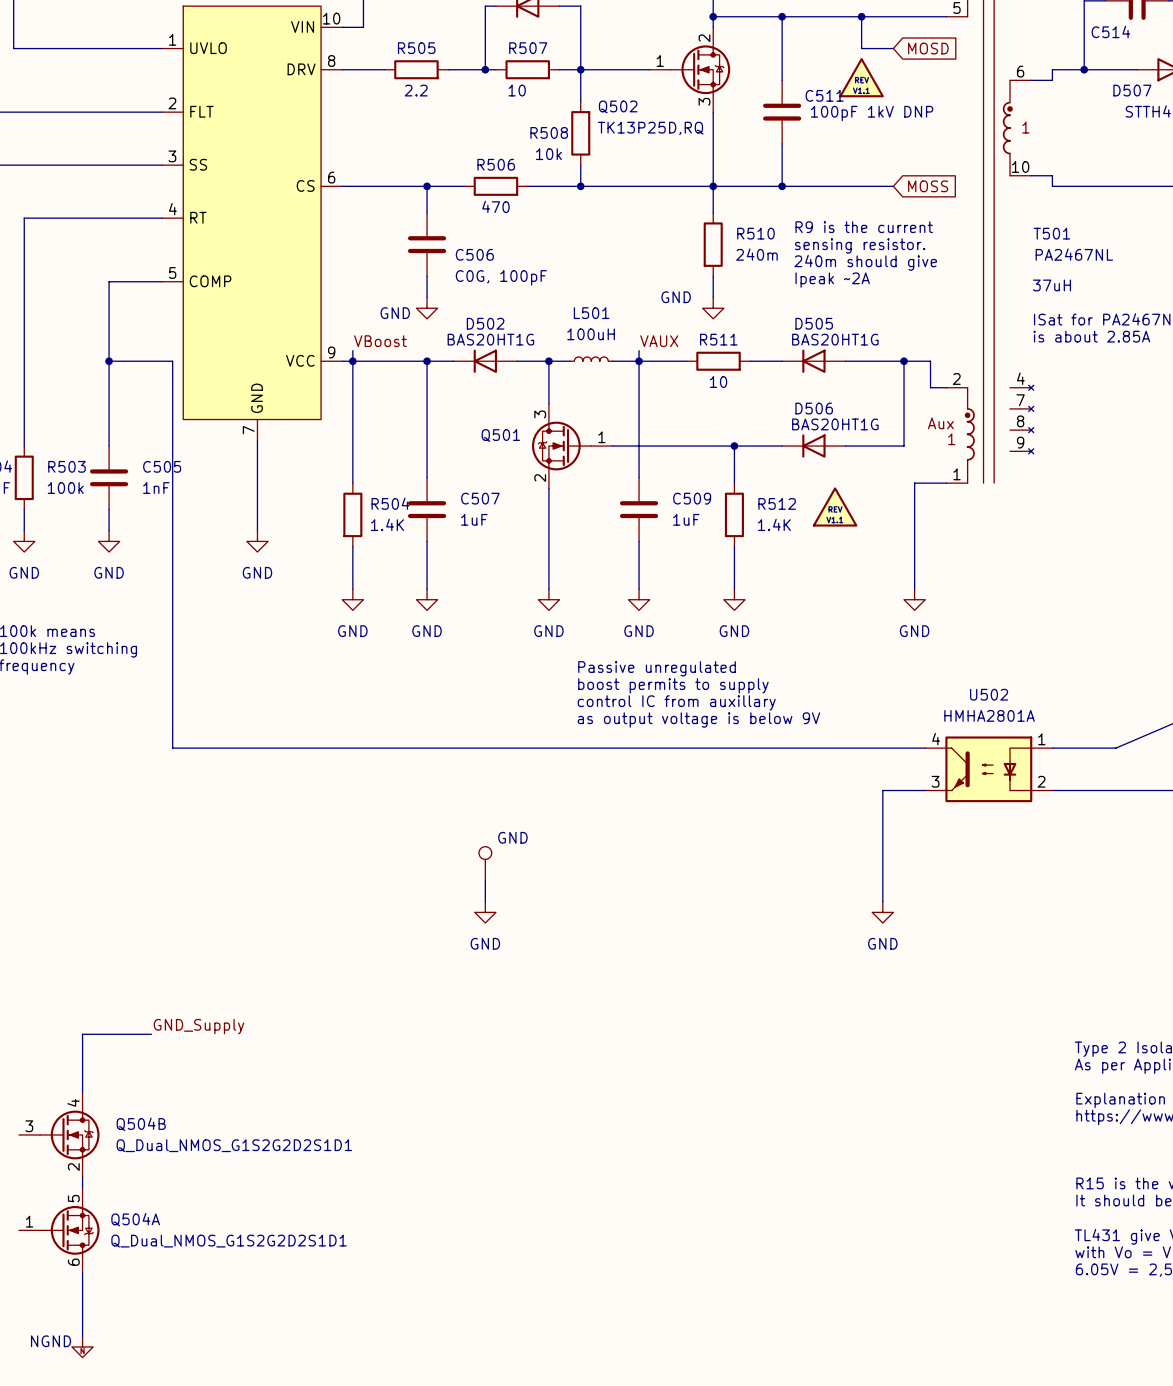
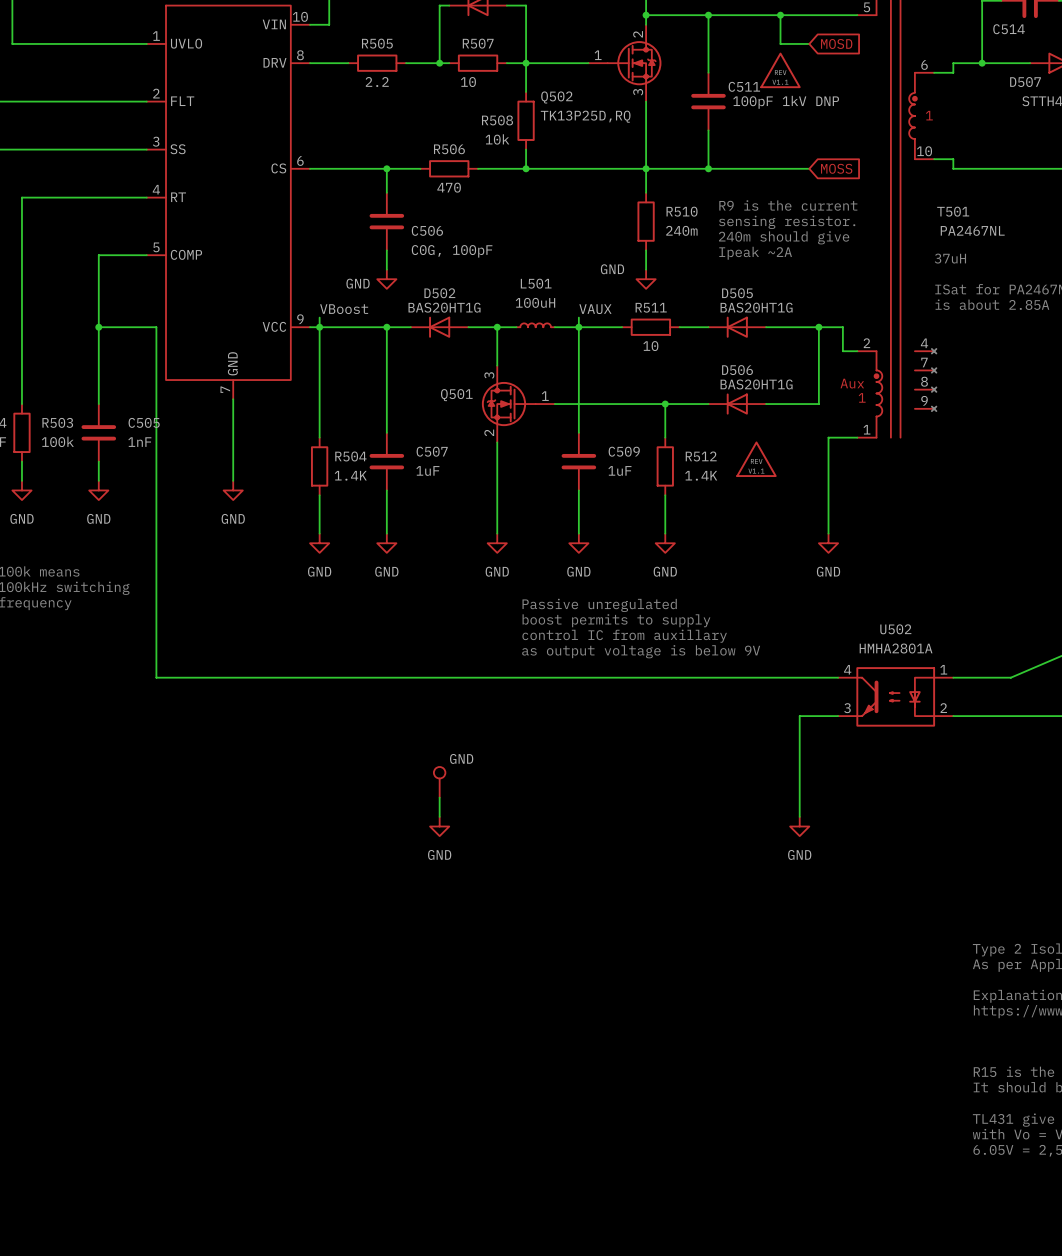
label: GND_Supply (198, 1026) -> none
wire: (151, 1034) (82, 1034) (82, 1092) -> none
Q504B: Q_Dual_NMOS_G1S2G2D2S1D1 (59, 1134) -> none
wire: (82, 1177) (82, 1187) -> none
Q504A: Q_Dual_NMOS_G1S2G2D2S1D1 (59, 1230) -> none
wire: (82, 1272) (82, 1336) -> none
power symbol: NGND (82, 1346) -> none

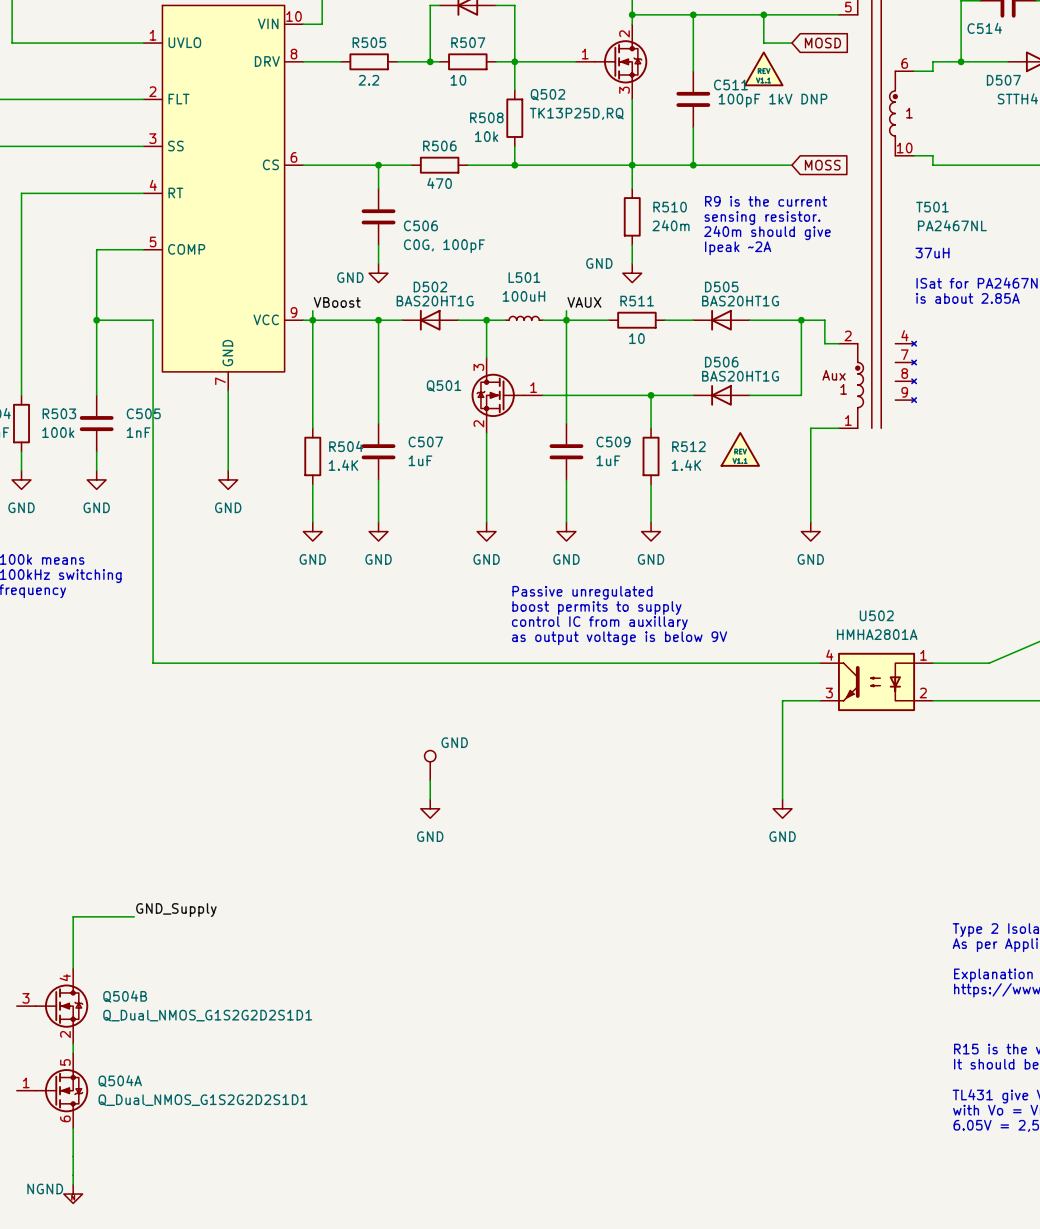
label: none -> GND_Supply (176, 910)
wire: none -> (134, 916) (73, 916) (73, 968)
Q504B: none -> Q_Dual_NMOS_G1S2G2D2S1D1 (52, 1006)
wire: none -> (73, 1043) (73, 1053)
Q504A: none -> Q_Dual_NMOS_G1S2G2D2S1D1 (52, 1090)
wire: none -> (73, 1128) (73, 1184)
power symbol: none -> NGND (73, 1194)

